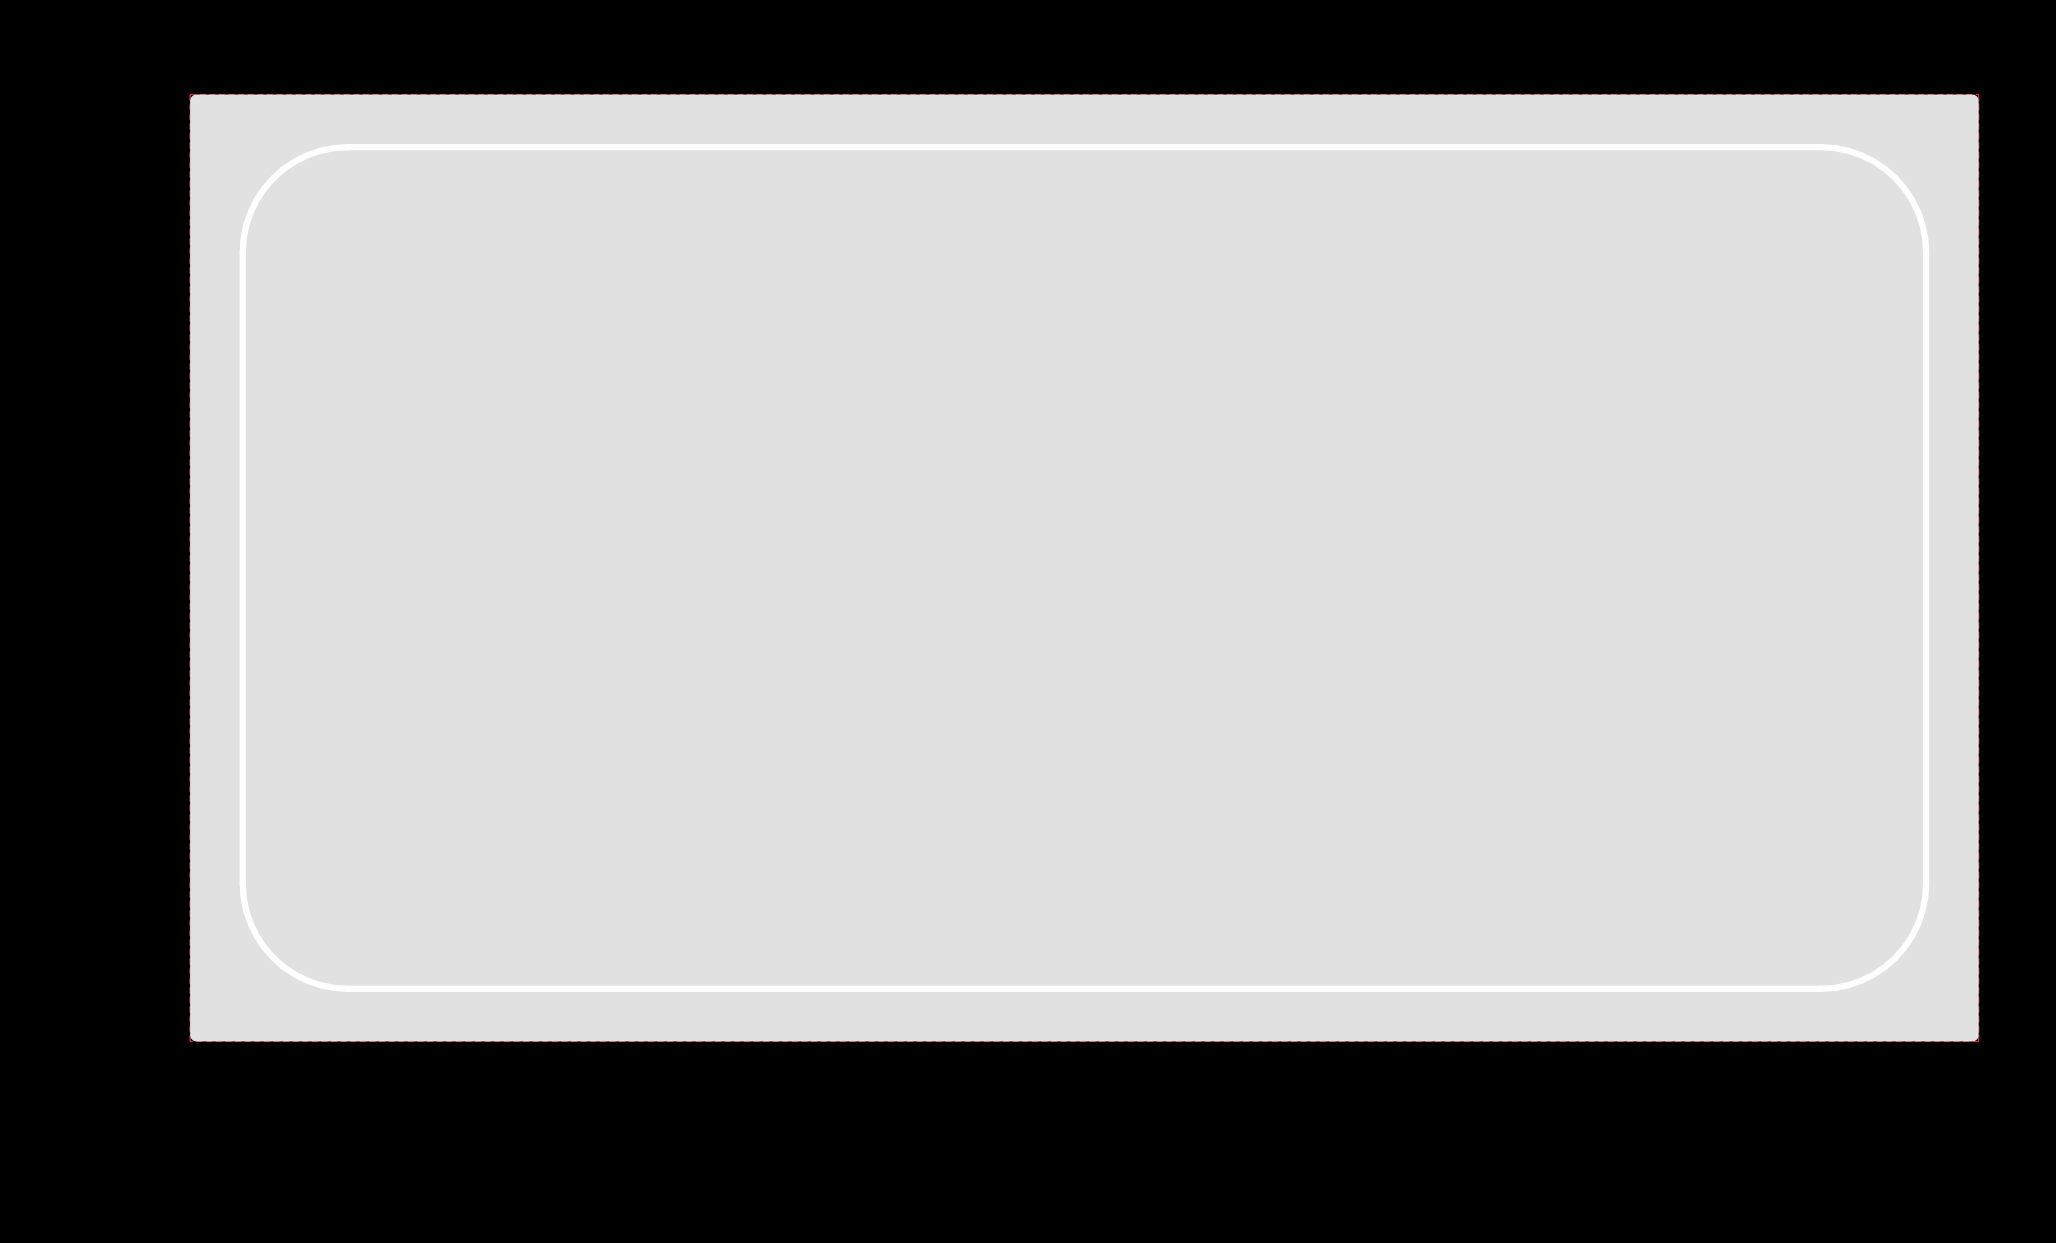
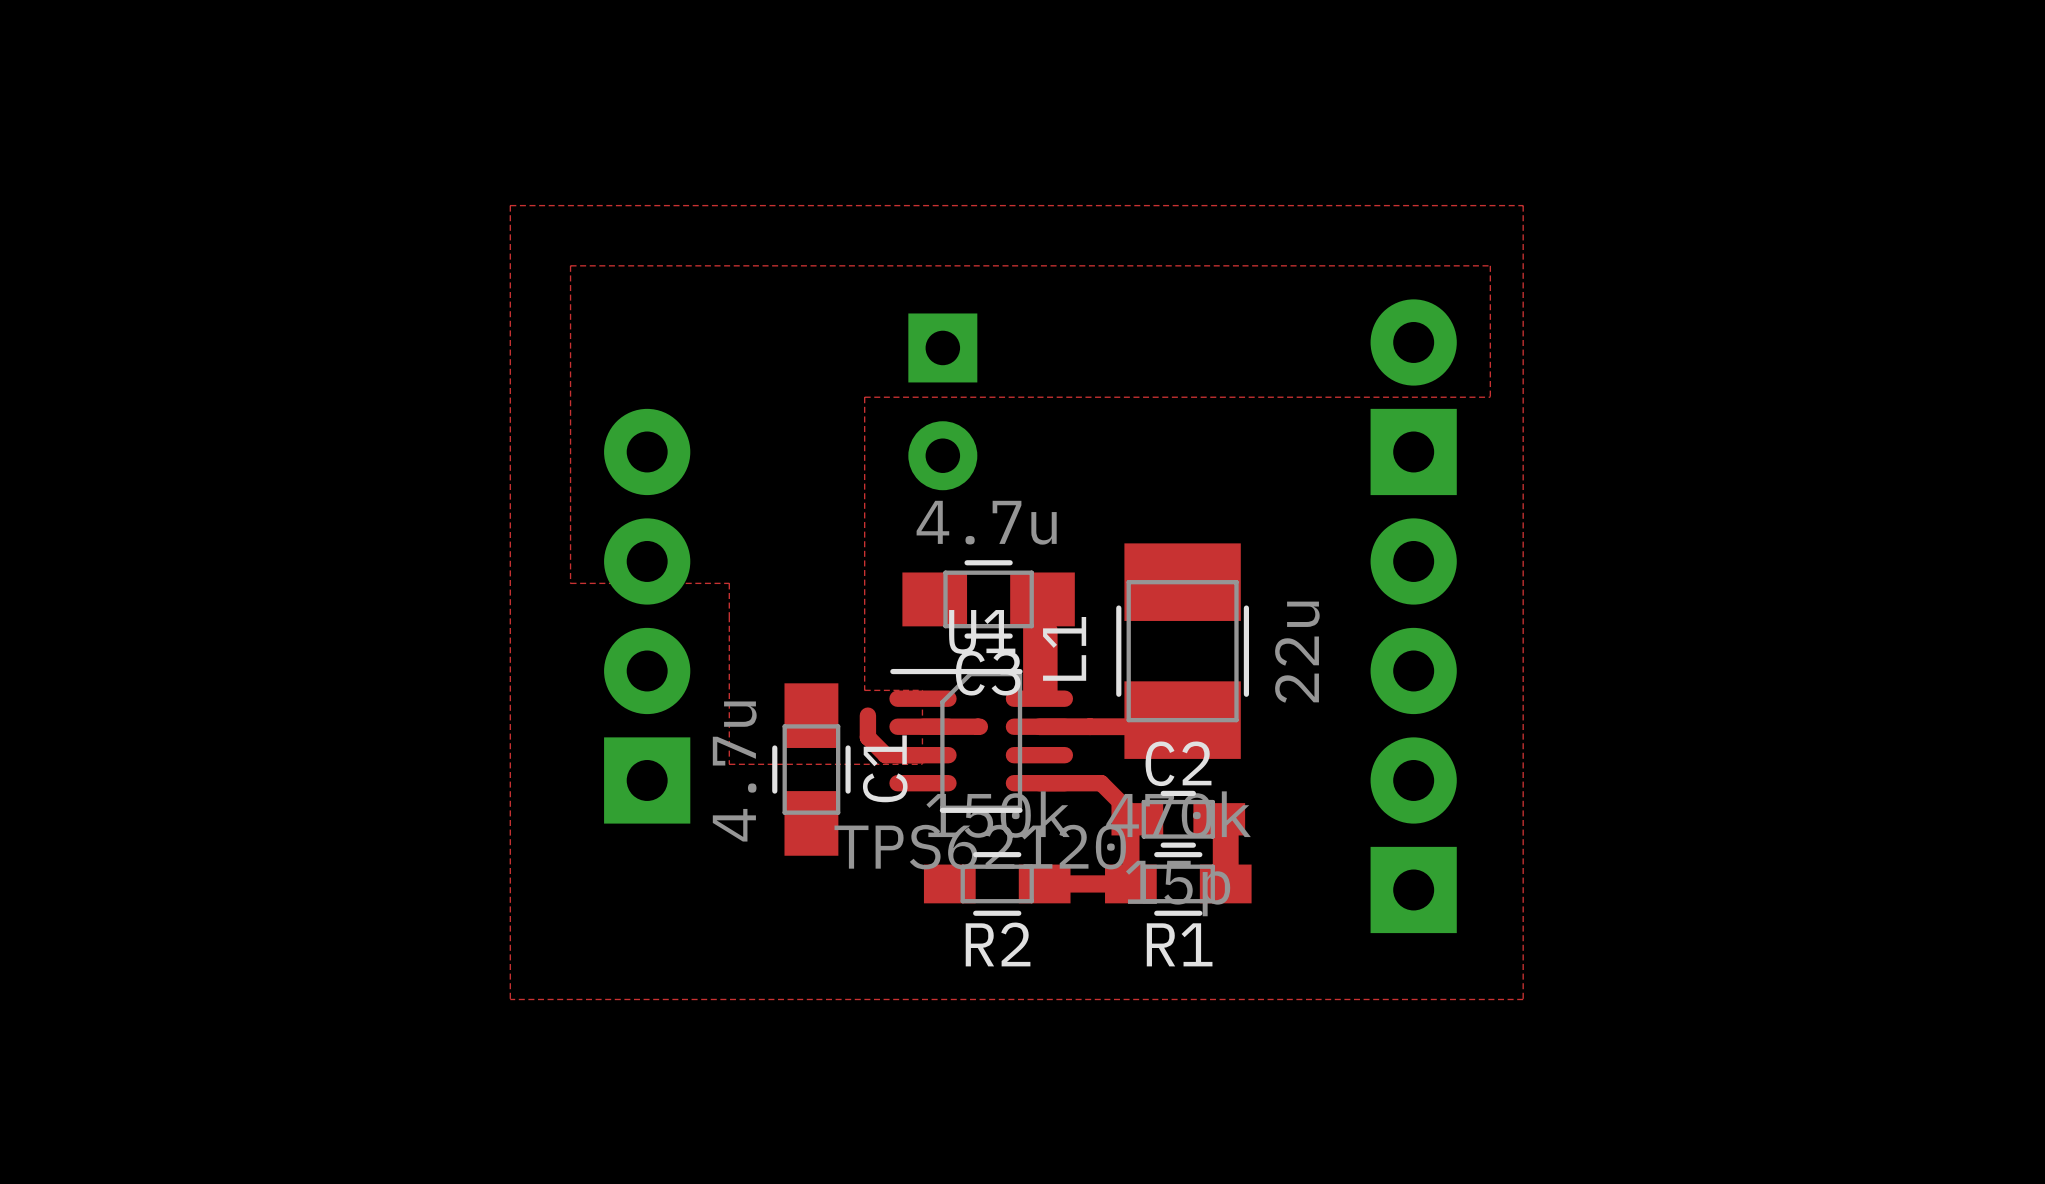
top zone outline: (190, 94) (1978, 94) (1978, 1041) (190, 1041) (190, 94) -> none
drawing: [190, 94, 1979, 1042] -> none
top zone outline: none -> (510, 205) (1523, 205) (1523, 999) (510, 999) (510, 205)
top track: none -> (1039, 606) (1039, 698)
top track: none -> (1029, 616) (1029, 692)
top track: none -> (1051, 629) (1051, 694)
part: none -> (1413, 725)

